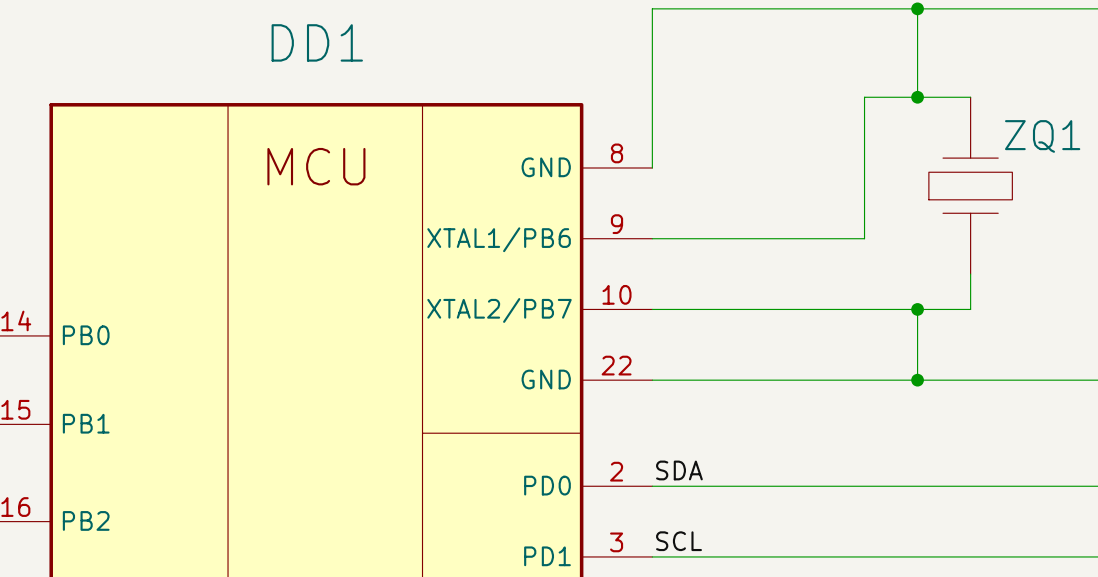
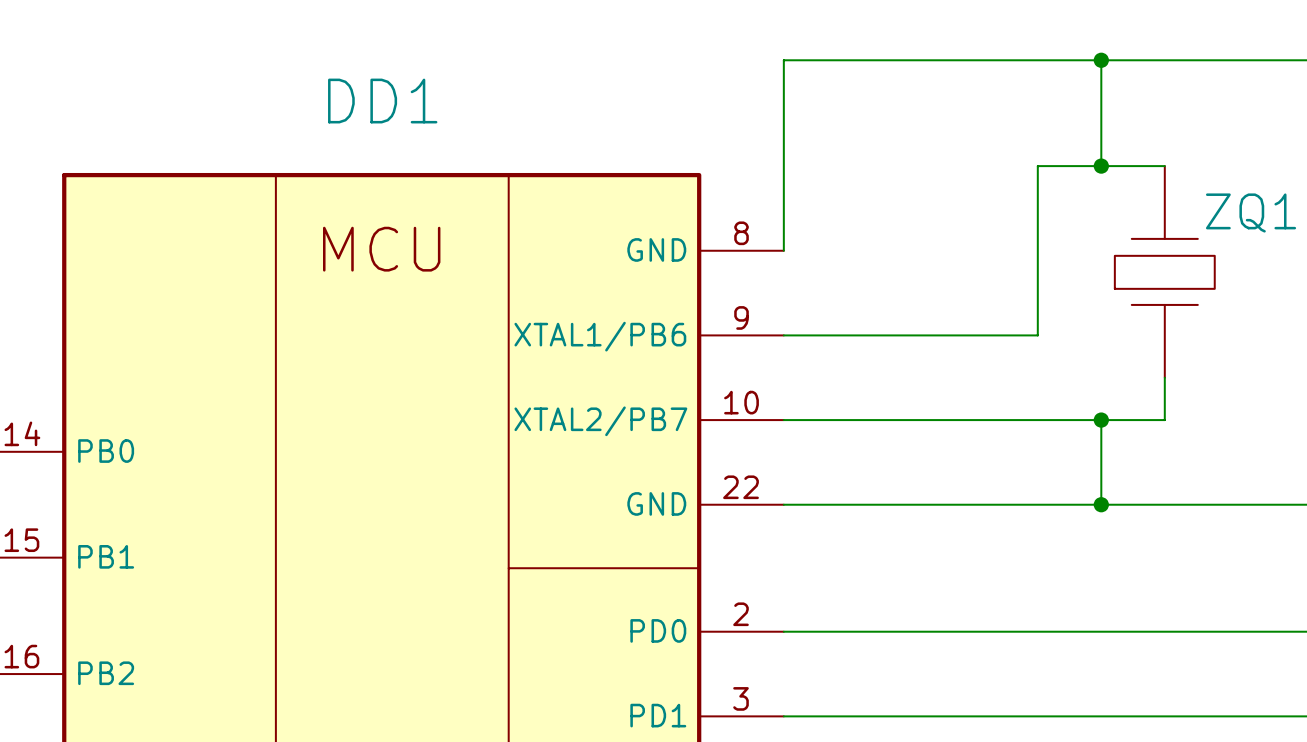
label: SDA (679, 470) -> none
label: SCL (679, 541) -> none

